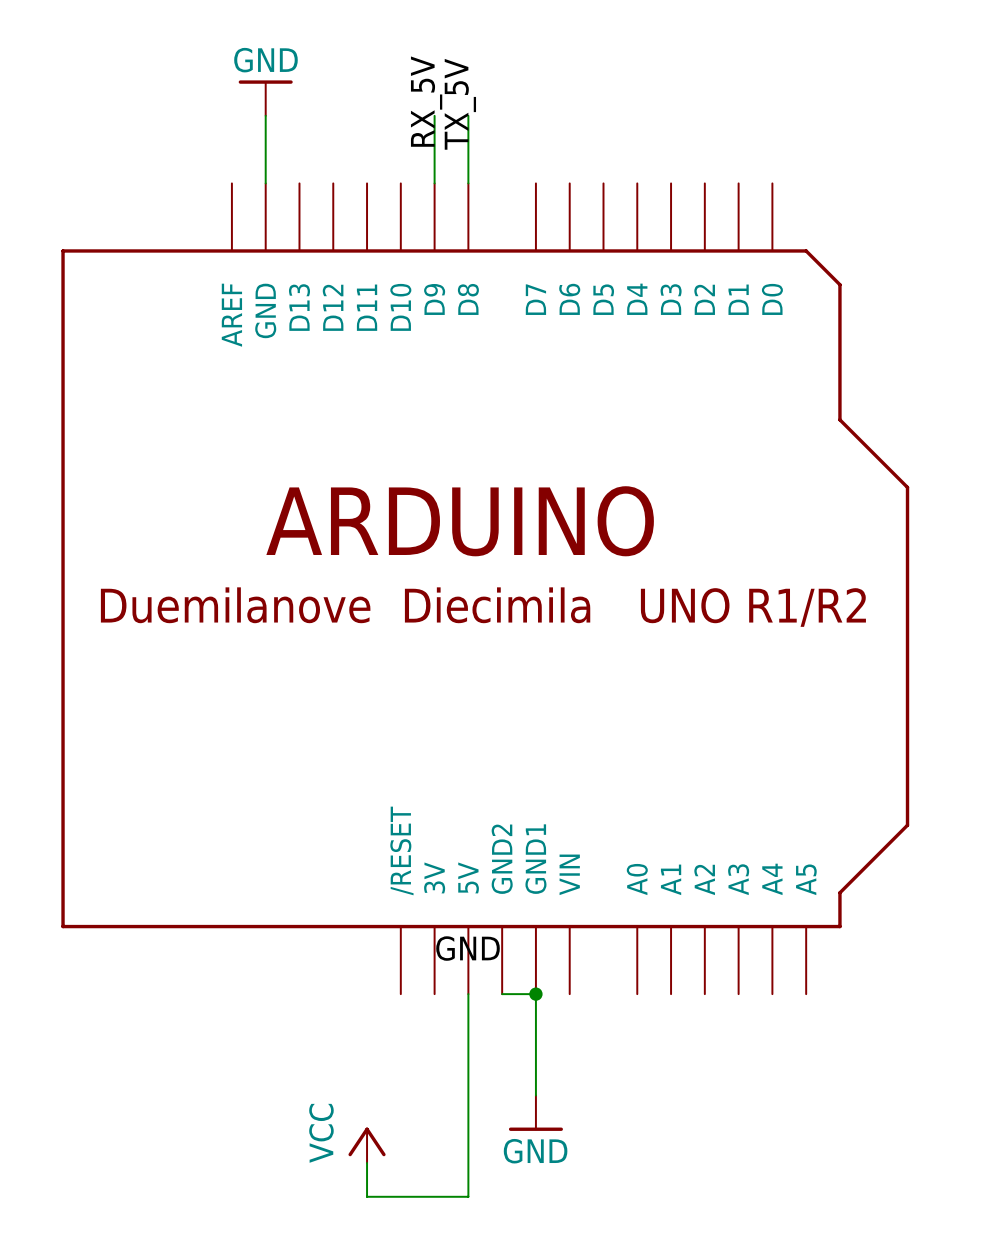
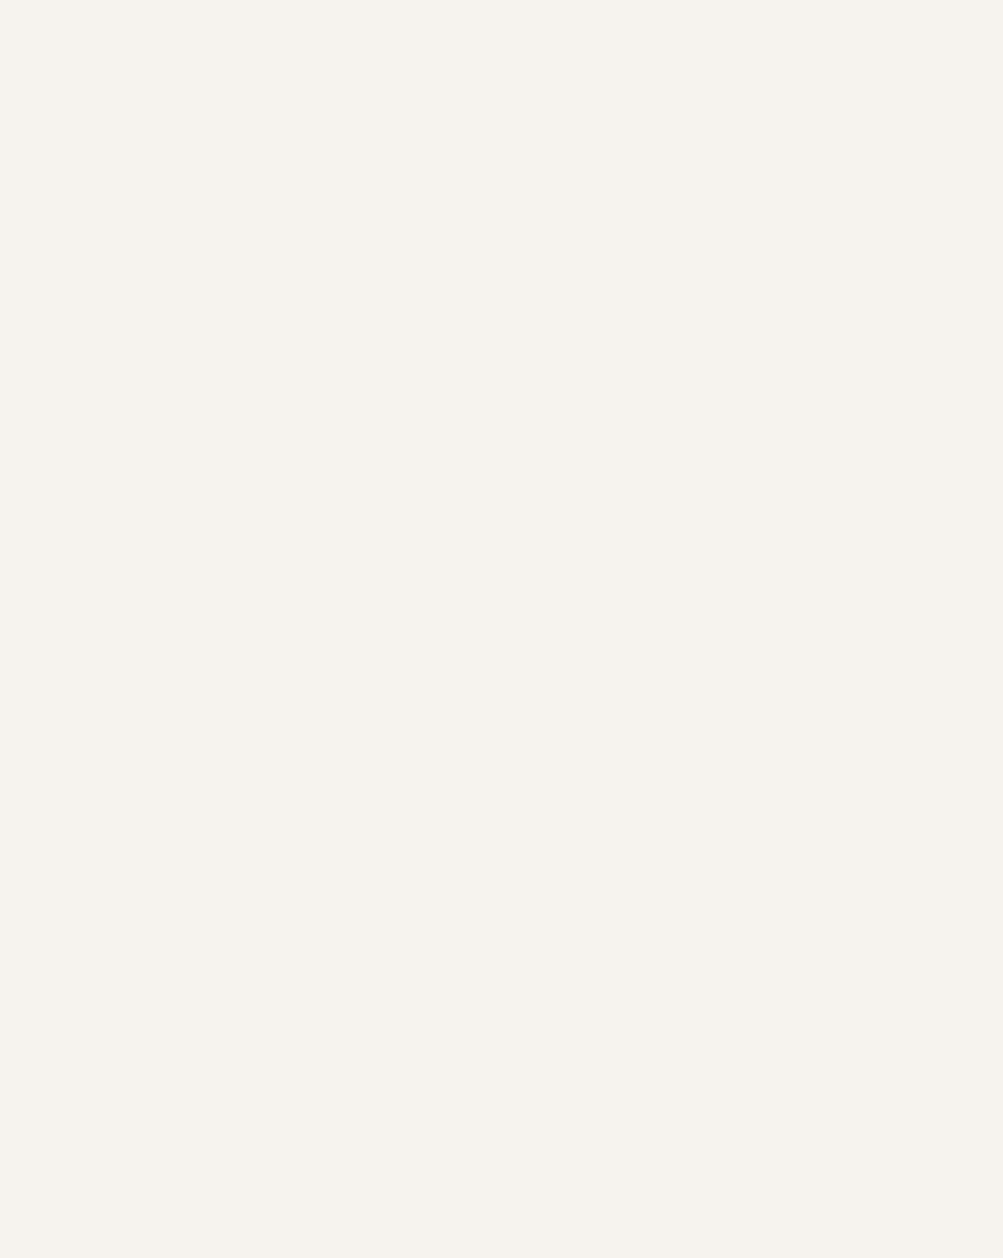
power symbol: GND (265, 98) -> none
label: RX_5V (426, 101) -> none
label: TX_5V (460, 104) -> none
wire: (265, 115) (265, 183) -> none
wire: (434, 115) (434, 183) -> none
wire: (468, 115) (468, 183) -> none
part: (485, 588) -> none
label: GND (468, 948) -> none
wire: (468, 994) (468, 1196) (367, 1196) (367, 1163) -> none
wire: (502, 994) (535, 994) (535, 1095) -> none
junction: (535, 994) -> none
power symbol: GND (535, 1113) -> none
power symbol: VCC (367, 1145) -> none

